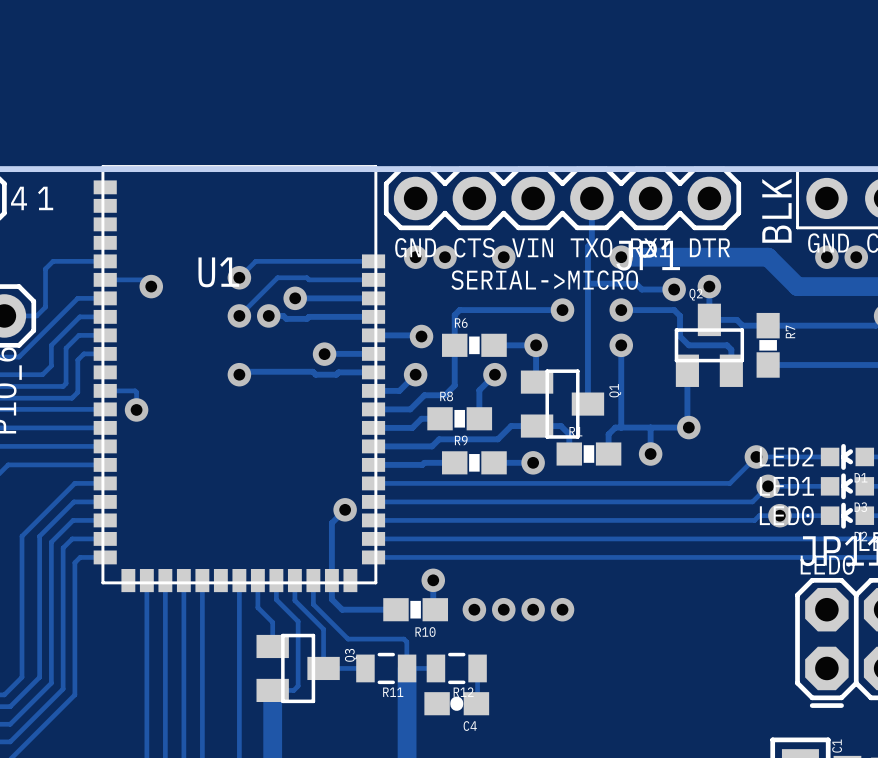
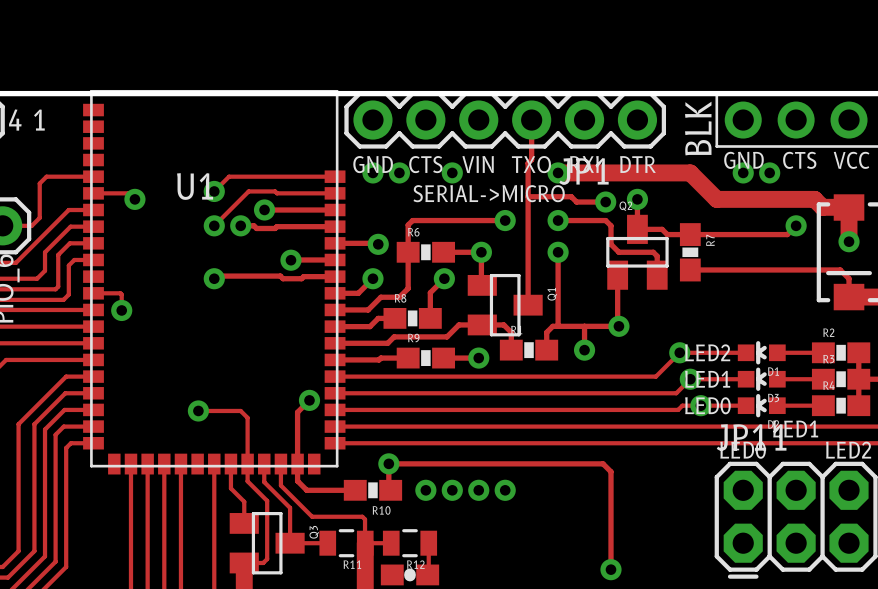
track: none -> (198, 410) (240, 410) (247, 417) (247, 464)
via: none -> (198, 410)
track: none -> (388, 463) (603, 463) (610, 471) (610, 569)
via: none -> (610, 569)

